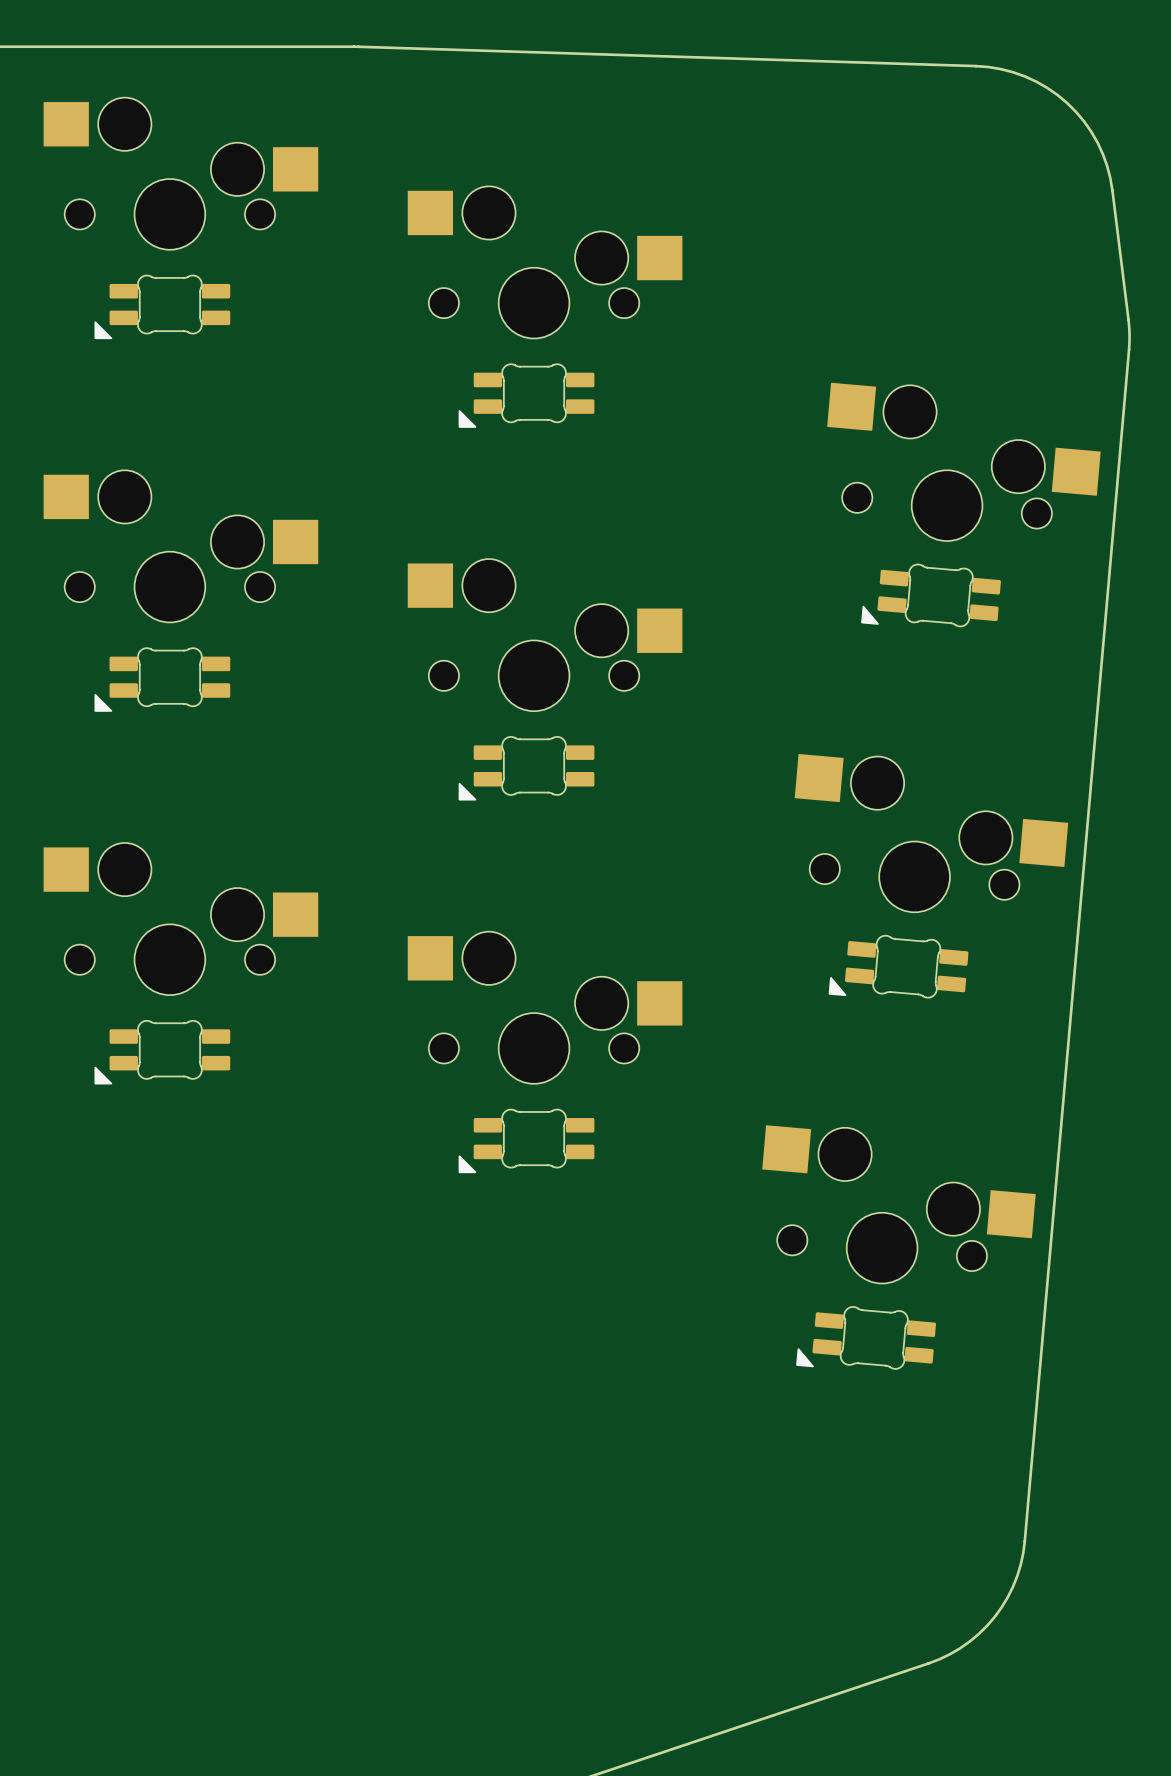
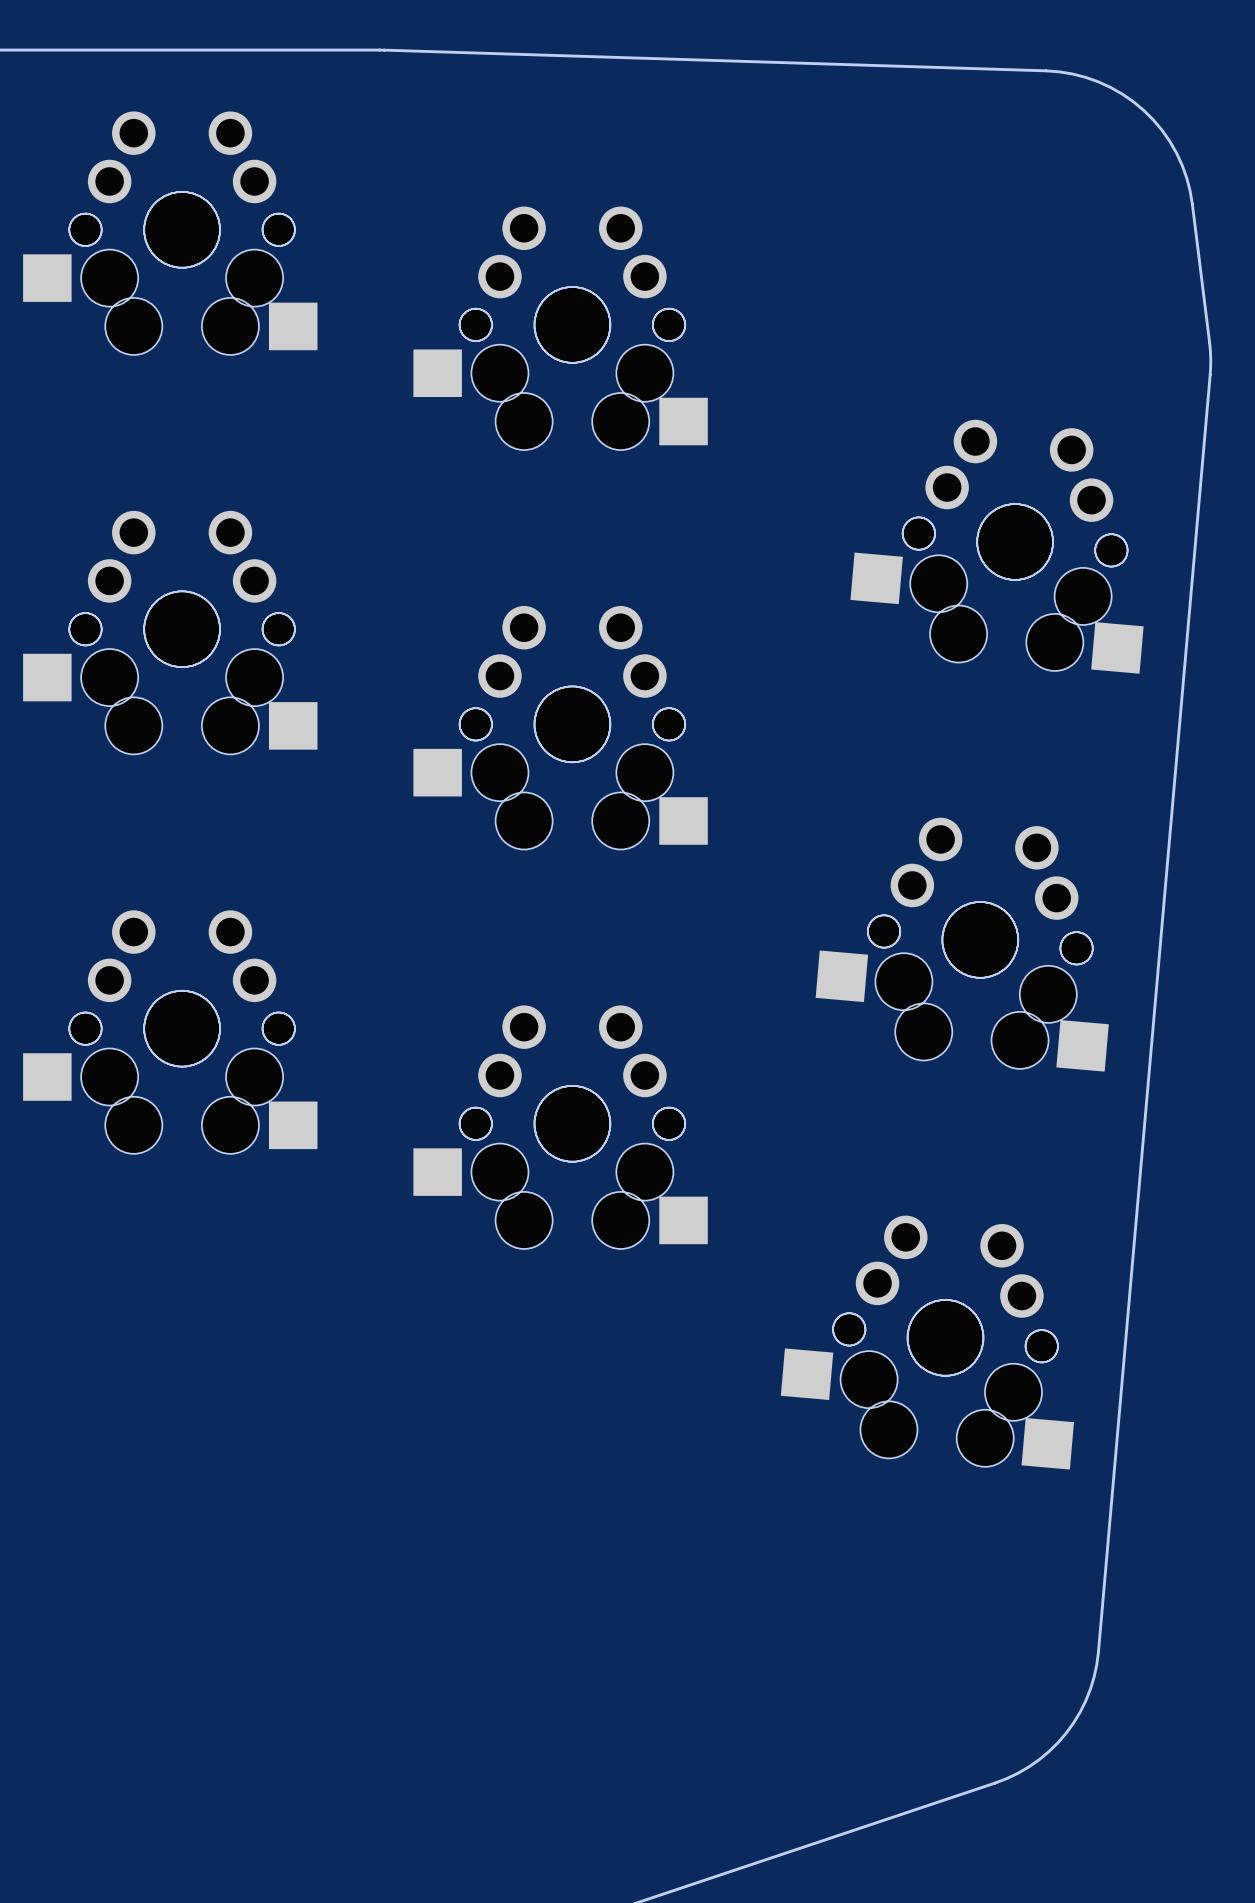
part footprint: [43, 97, 319, 250] -> [69, 111, 295, 268]
part footprint: [407, 186, 683, 339] -> [459, 206, 686, 363]
part: none -> (170, 273)
part: (162, 306) -> none
part: none -> (560, 368)
part footprint: [827, 382, 1101, 542] -> [902, 419, 1128, 580]
part: (526, 395) -> none
part footprint: [43, 470, 319, 623] -> [69, 510, 295, 668]
part: none -> (997, 588)
part footprint: [407, 559, 683, 712] -> [459, 605, 686, 763]
part: (931, 595) -> none
part: none -> (170, 672)
part: (162, 679) -> none
part: none -> (560, 767)
part footprint: [794, 753, 1069, 913] -> [867, 817, 1093, 978]
part: (526, 768) -> none
part footprint: [43, 842, 319, 996] -> [69, 910, 295, 1067]
part: none -> (962, 986)
part footprint: [407, 931, 683, 1084] -> [459, 1005, 686, 1162]
part: (898, 966) -> none
part: none -> (170, 1072)
part: (162, 1052) -> none
part: none -> (560, 1167)
part footprint: [762, 1125, 1036, 1284] -> [833, 1215, 1058, 1376]
part: (526, 1140) -> none
part: none -> (927, 1384)
part: (866, 1337) -> none

